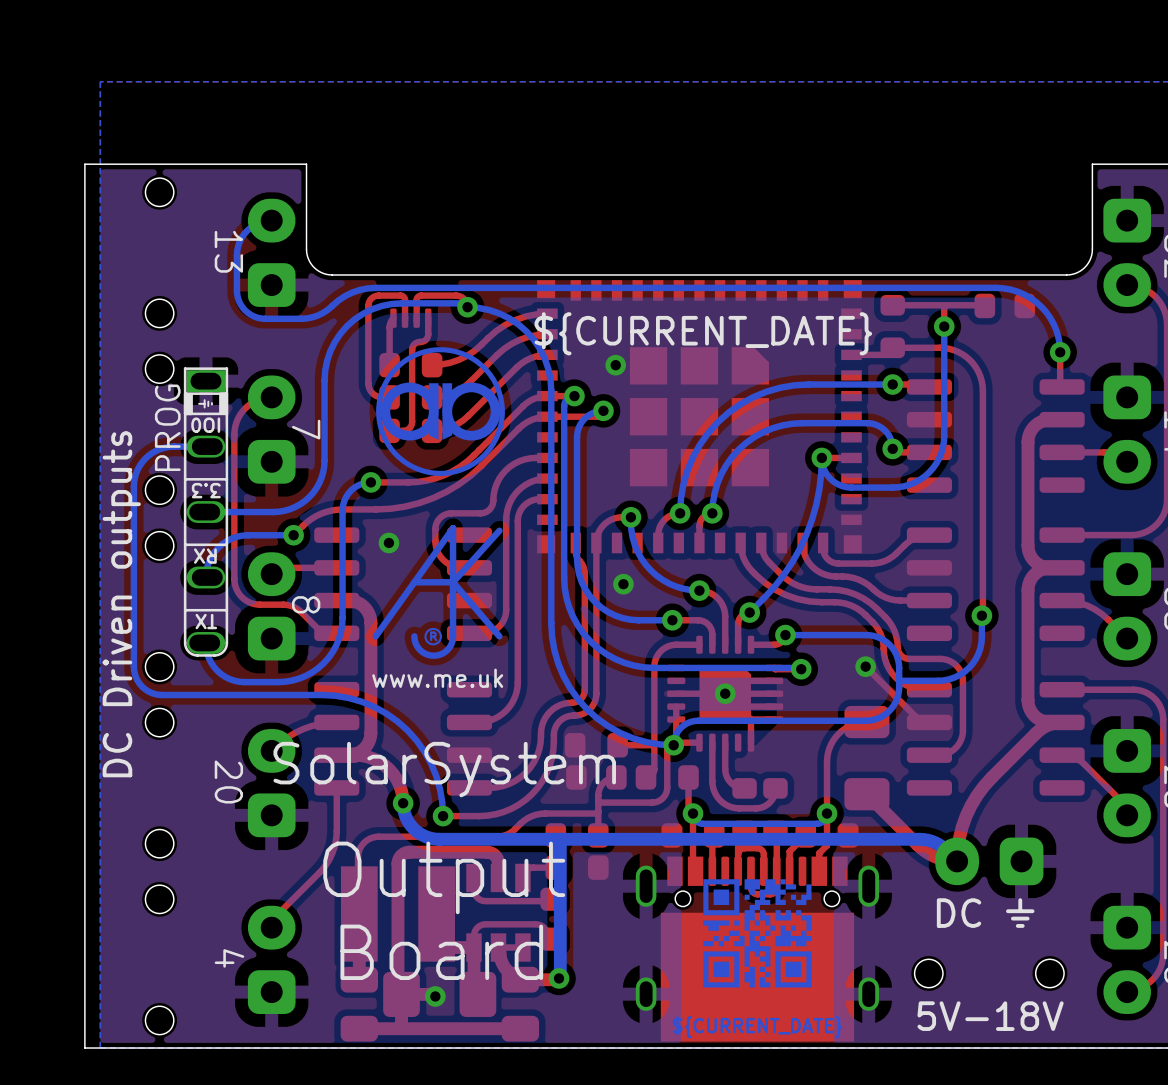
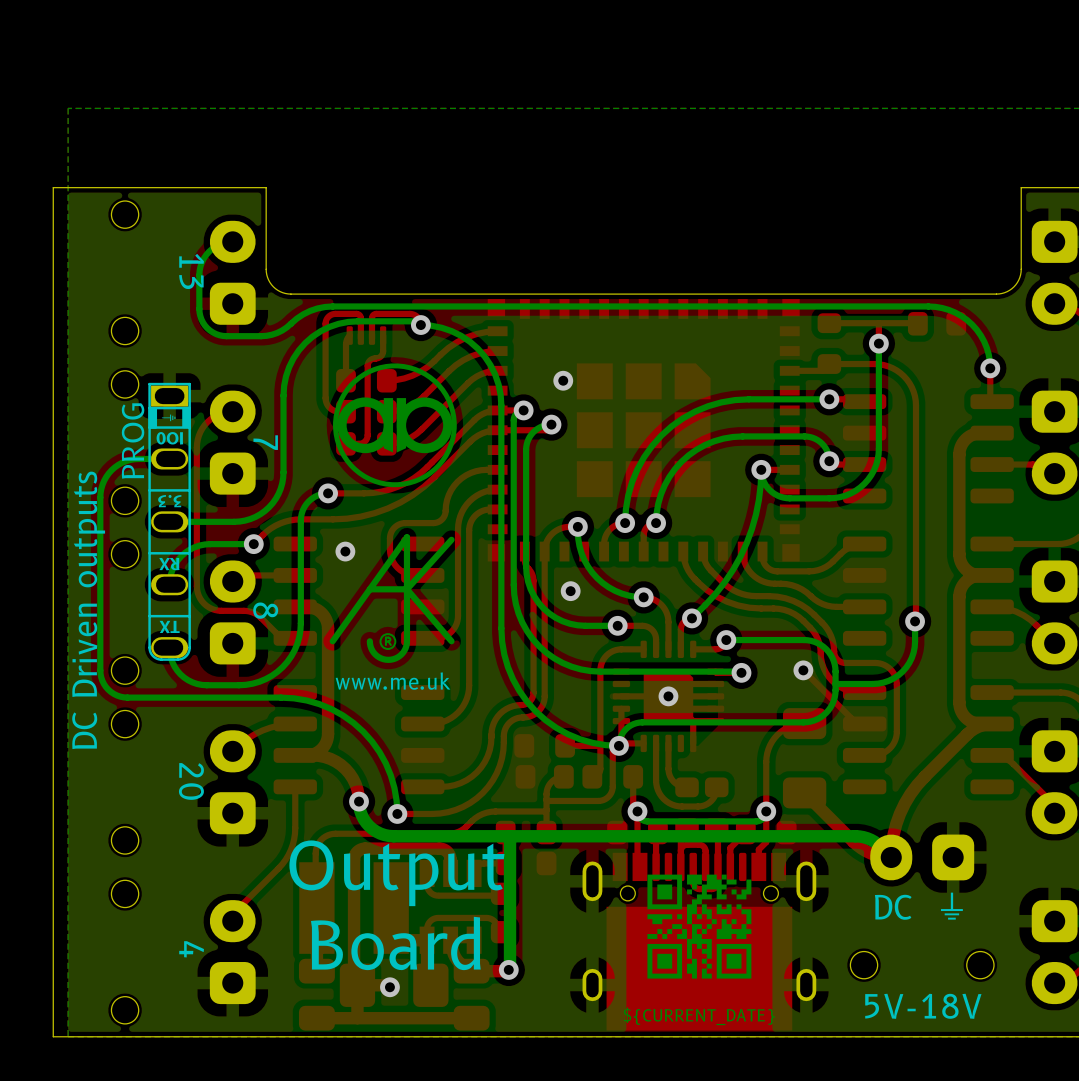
text: ${CURRENT_DATE} (703, 333) -> none
text: SolarSystem (444, 769) -> none

